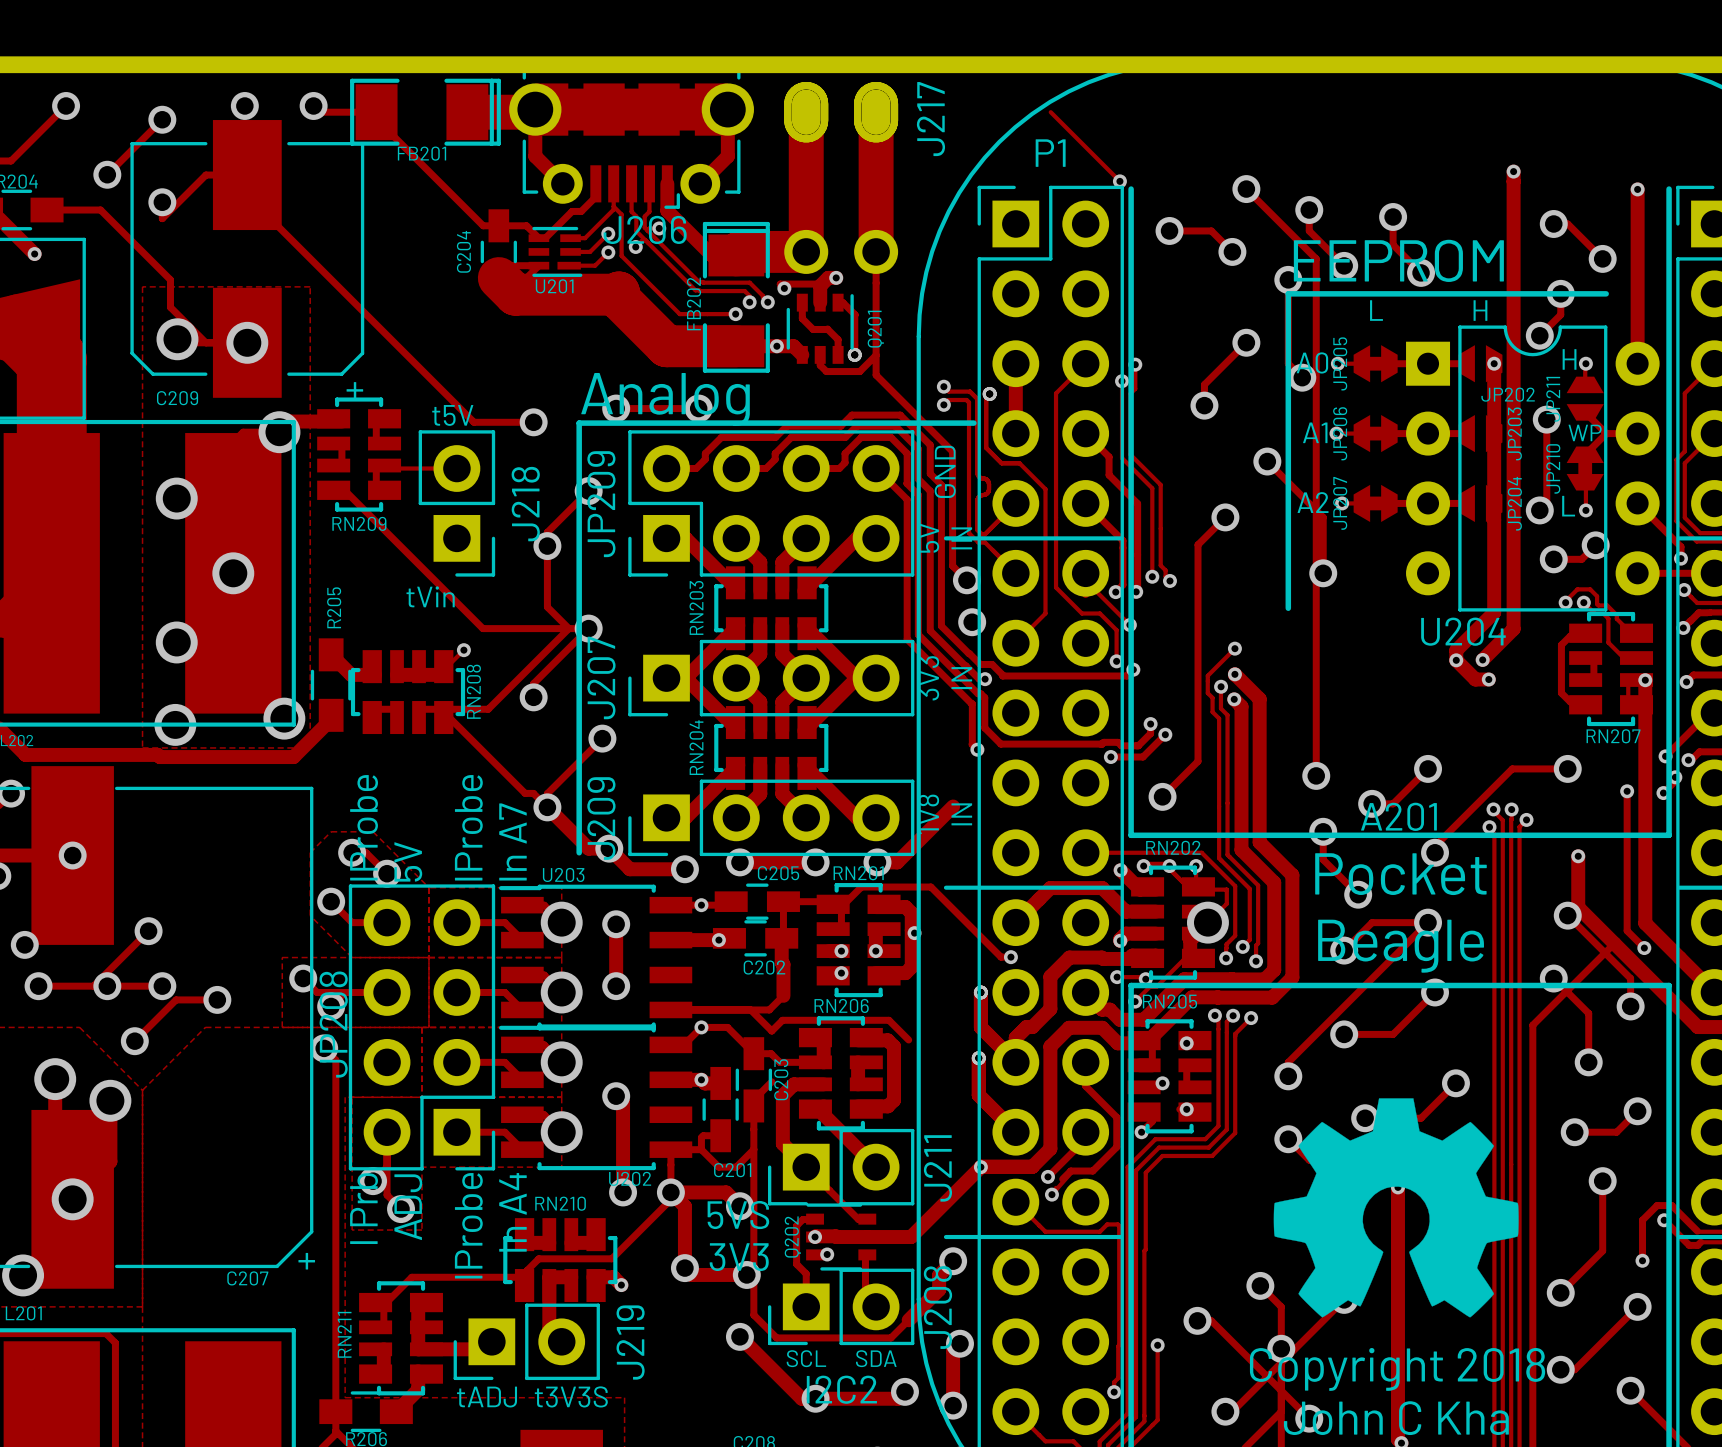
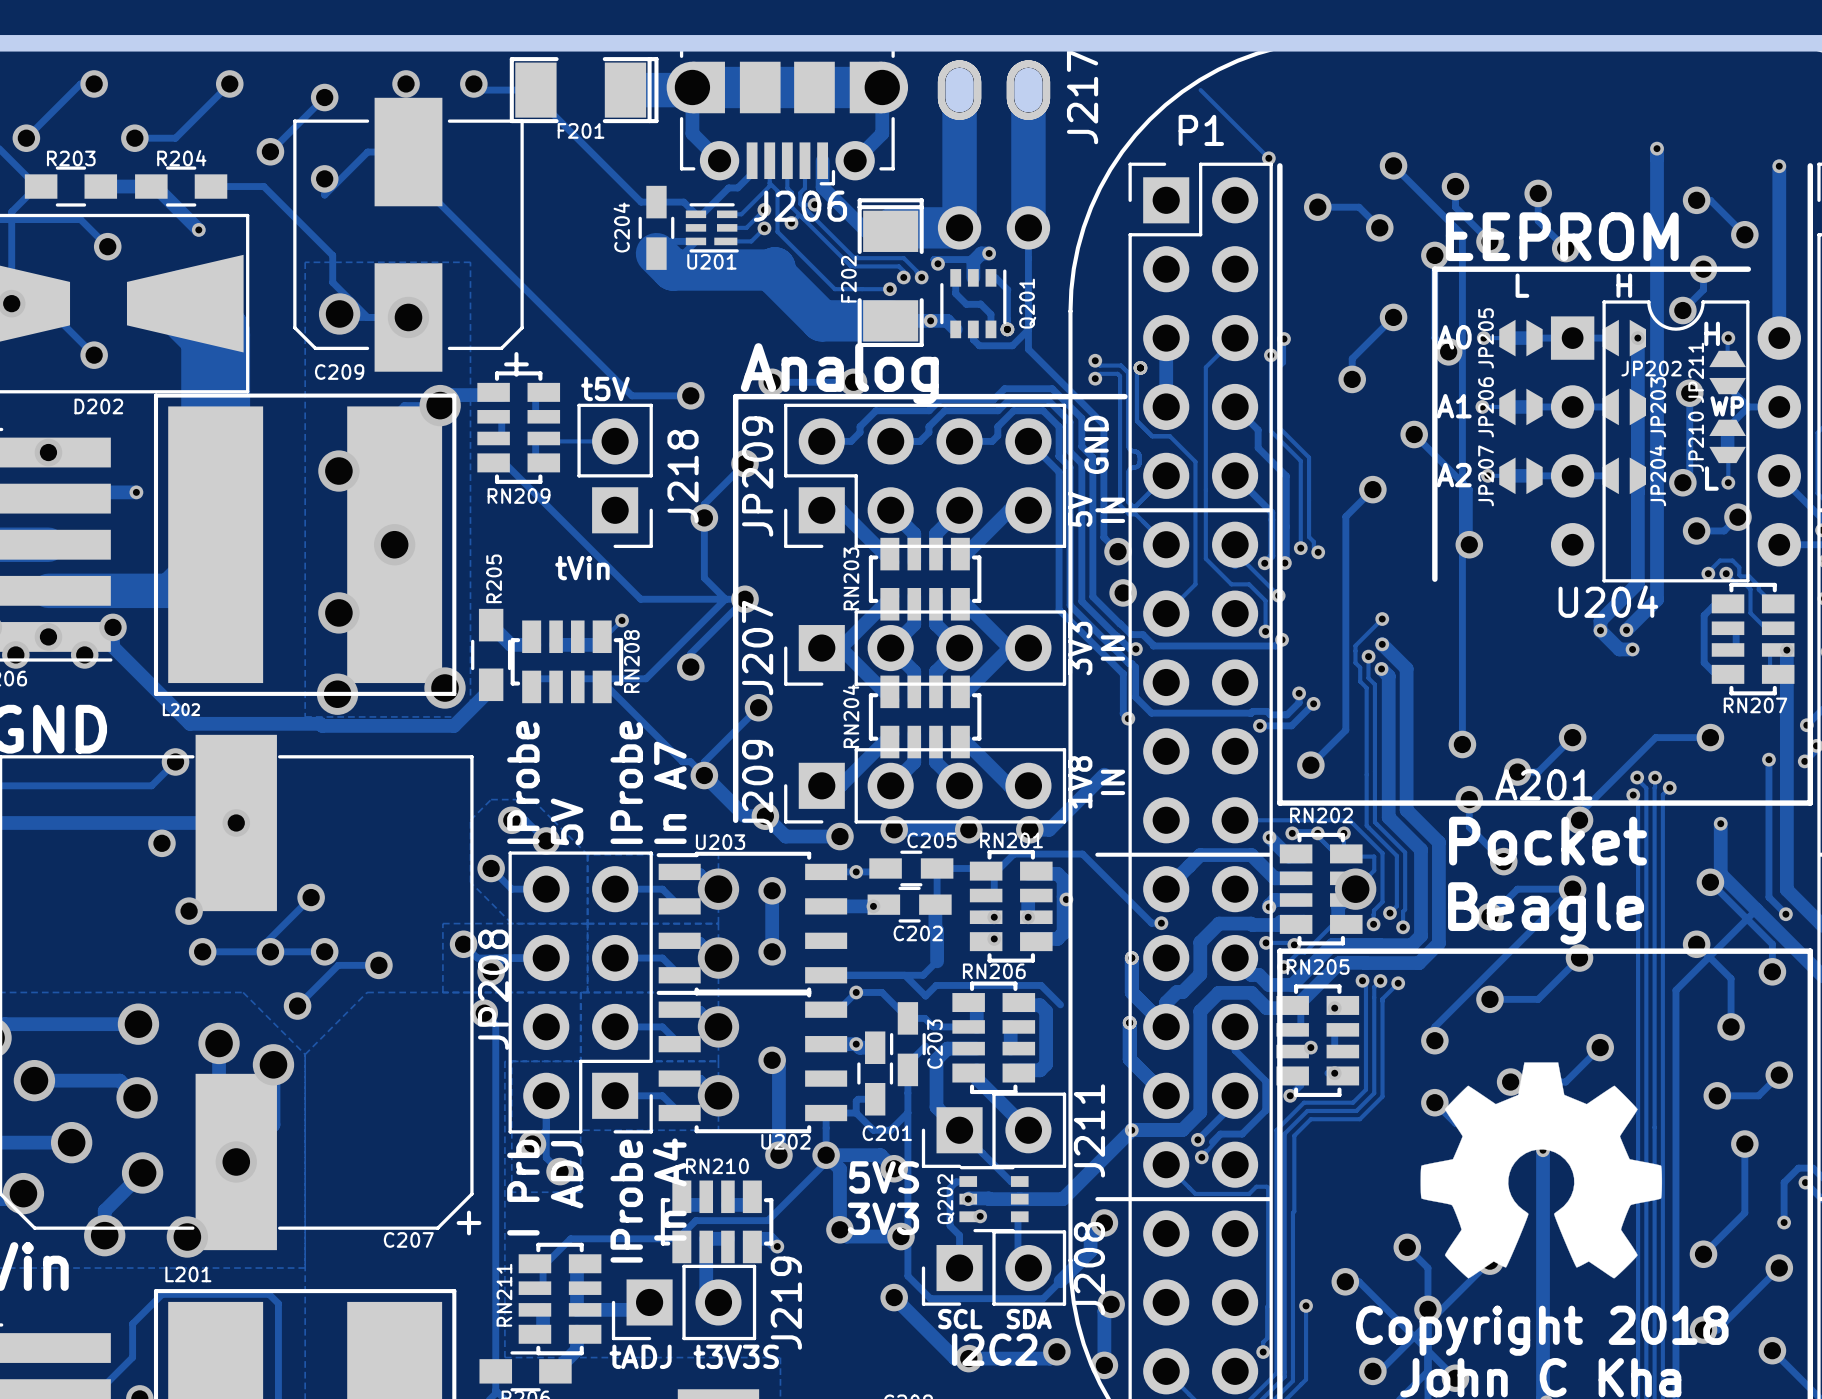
FB201 name: FB201 (422, 153) -> F201 (581, 130)
FB202 name: FB202 (693, 303) -> F202 (848, 279)

